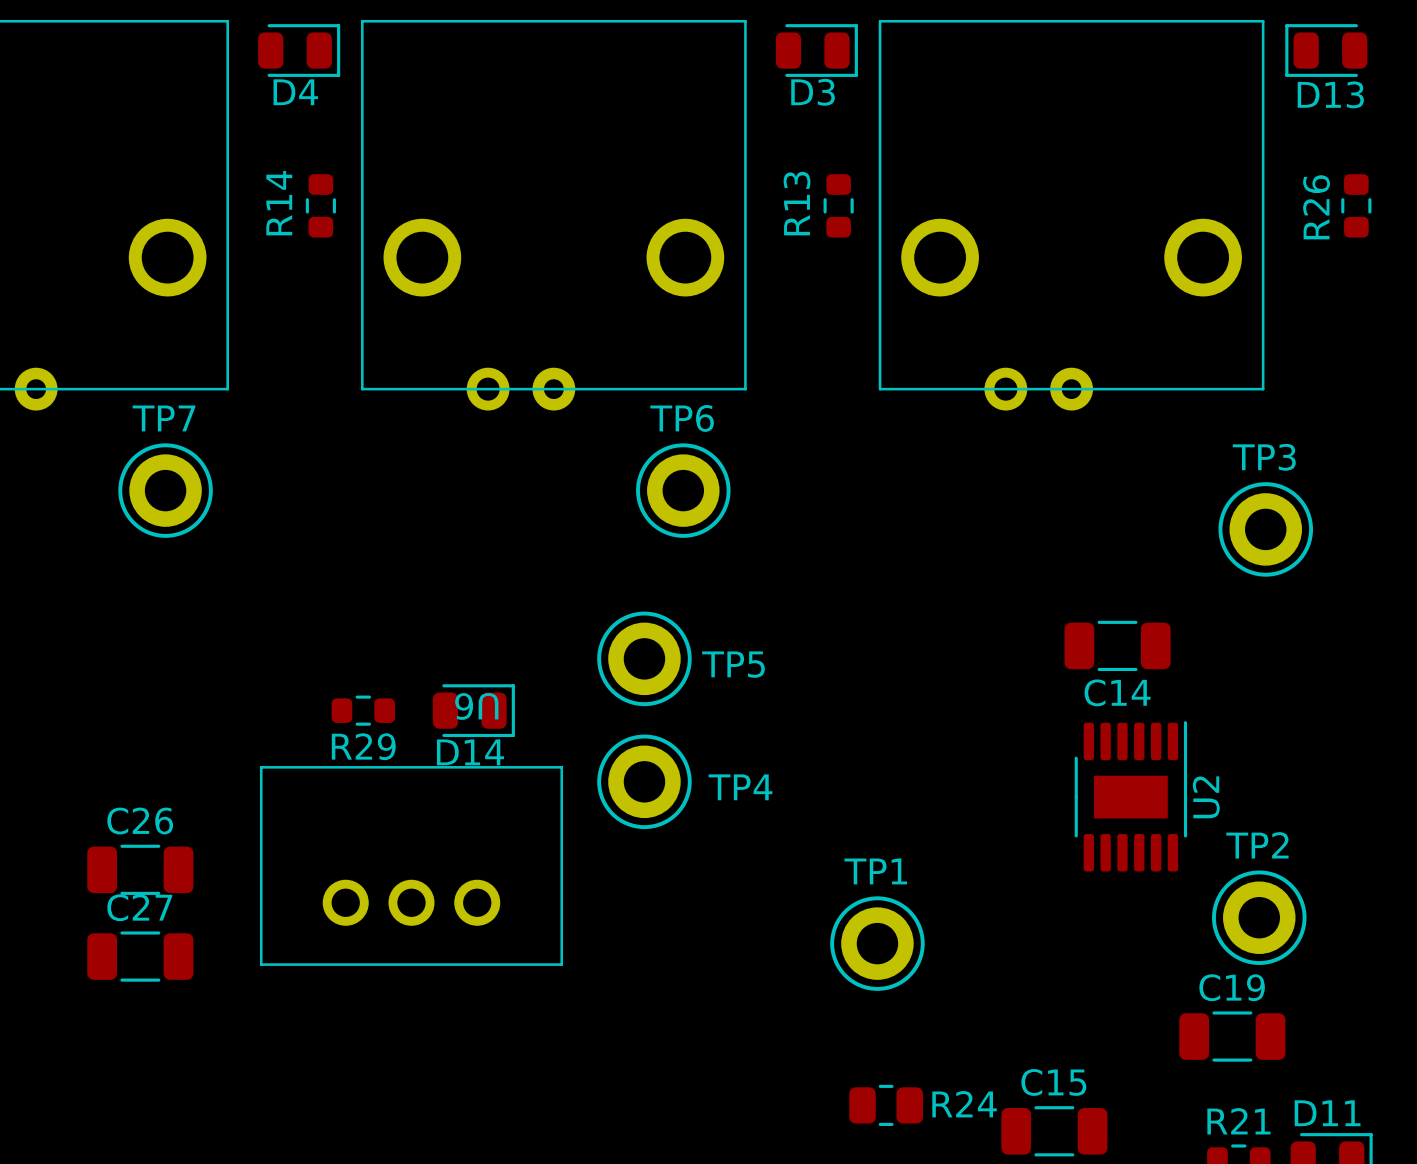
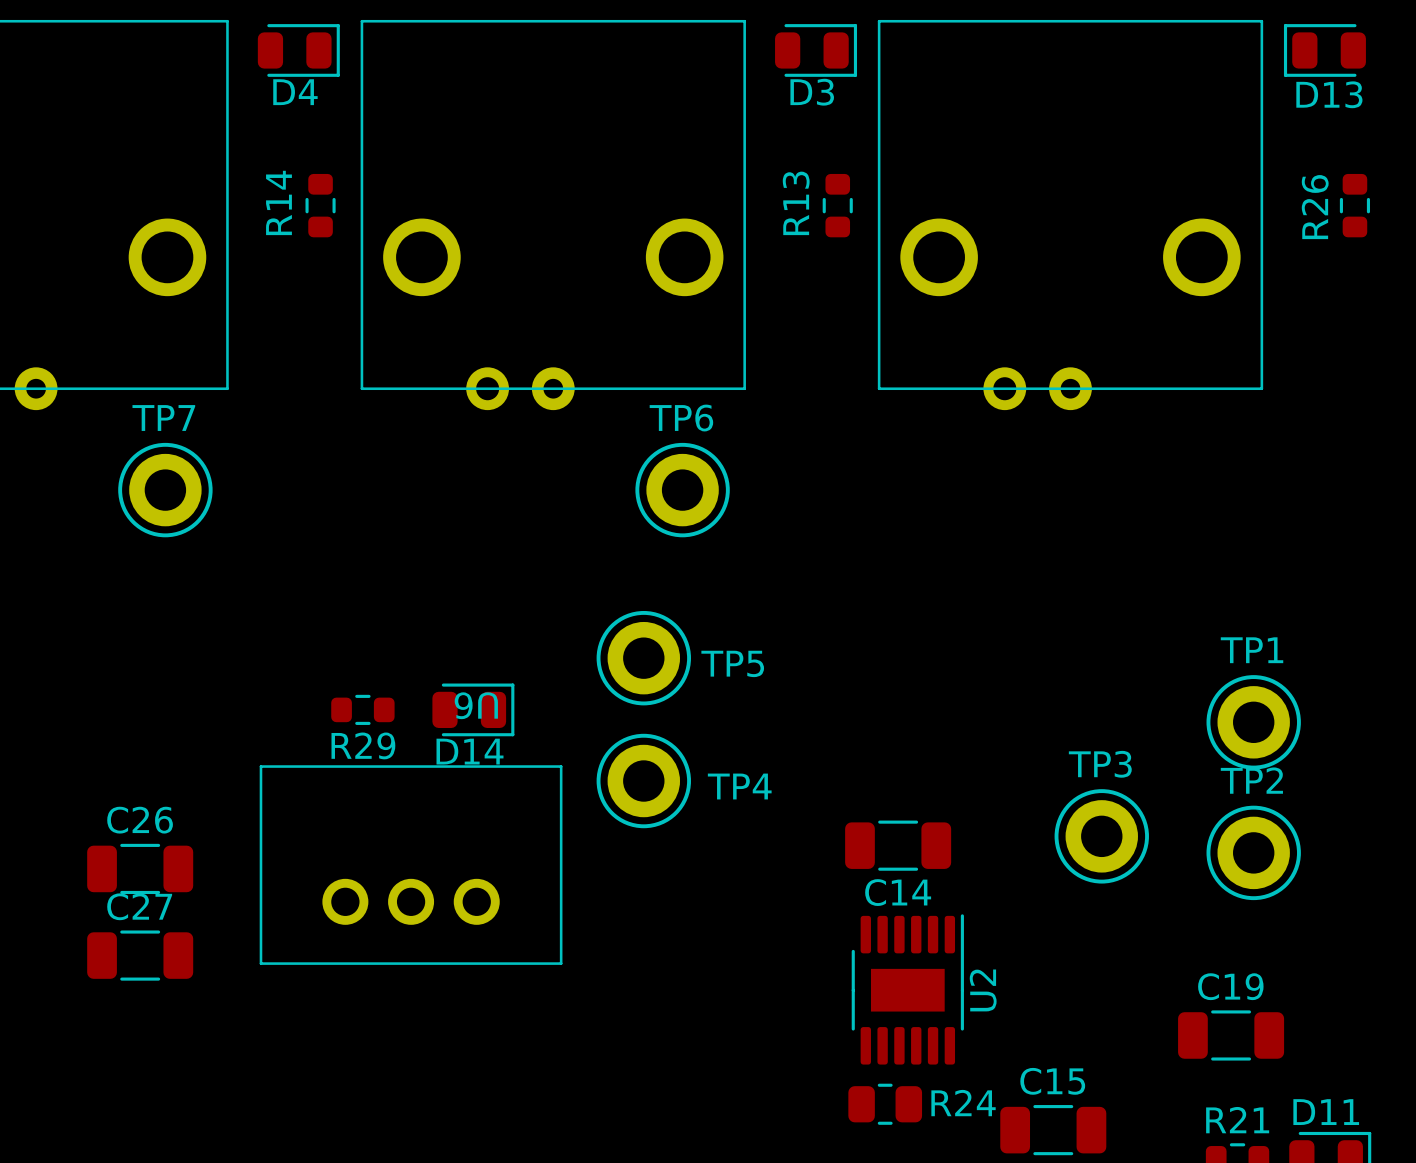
TP3 position: (1265, 529) -> (1101, 836)
C14 position: (1117, 645) -> (898, 845)
U2 position: (1130, 796) -> (907, 989)
TP2 position: (1259, 917) -> (1253, 852)
TP1 position: (877, 943) -> (1253, 722)

